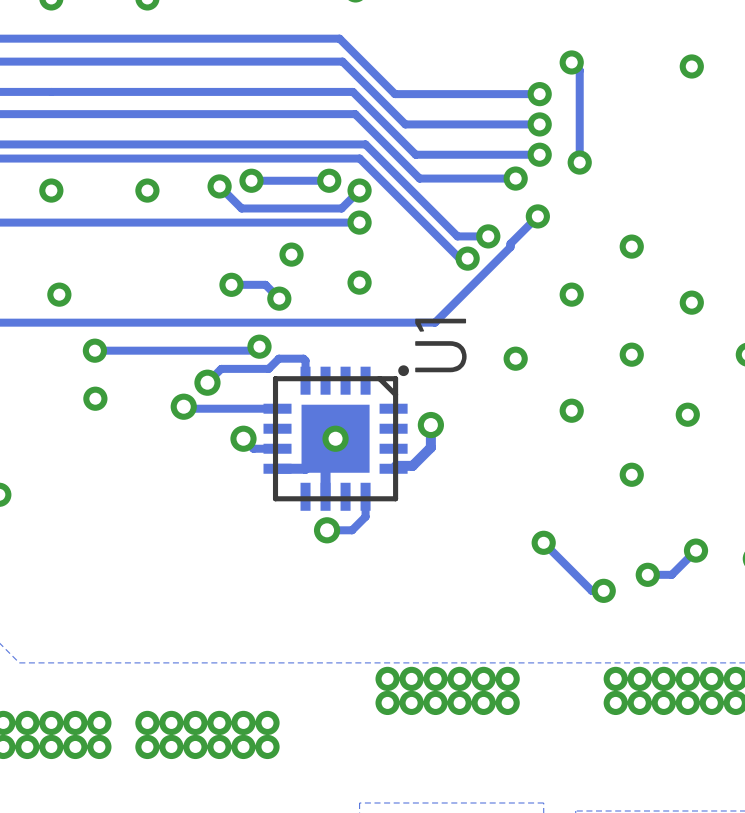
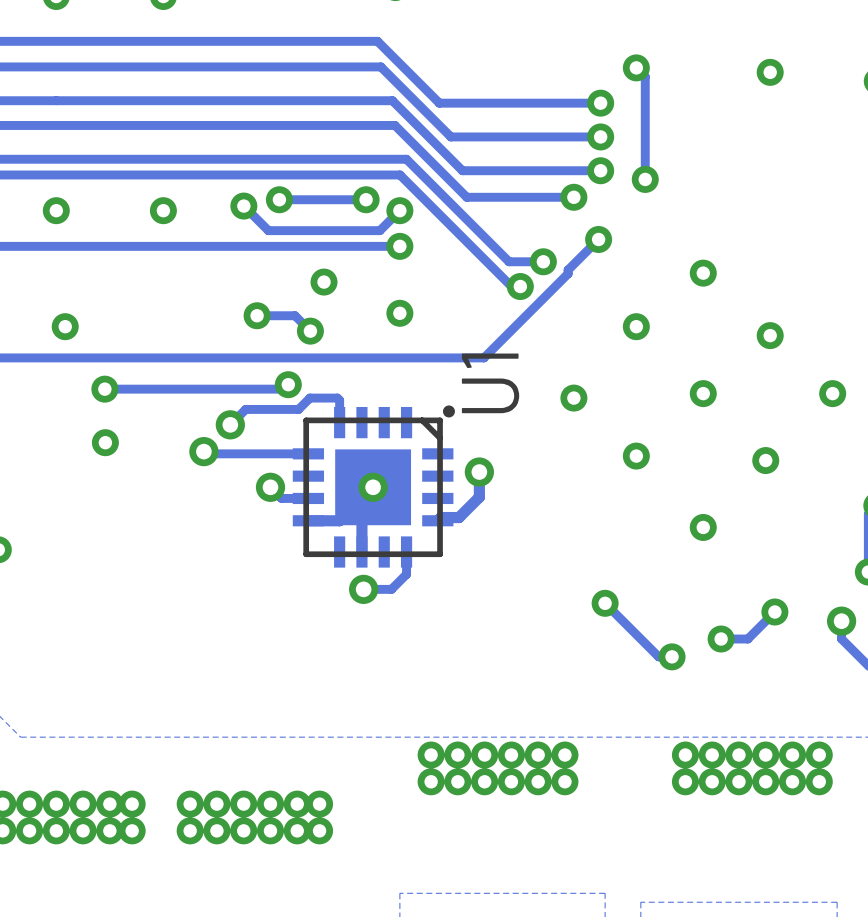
via: none -> (132, 804)
via: (147, 722) -> none
via: none -> (319, 804)
via: none -> (132, 830)
via: (147, 746) -> none
via: none -> (319, 830)

